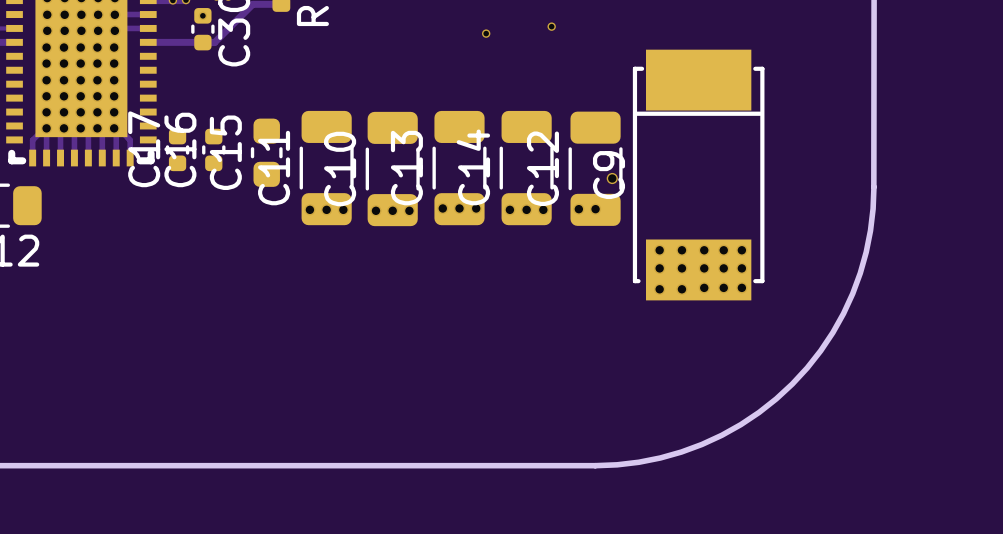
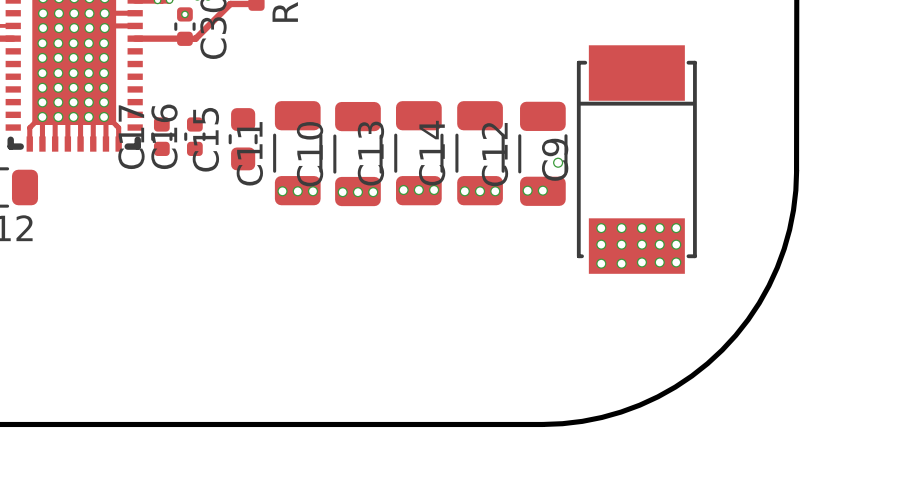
via: (551, 26) -> none
via: (486, 33) -> none

